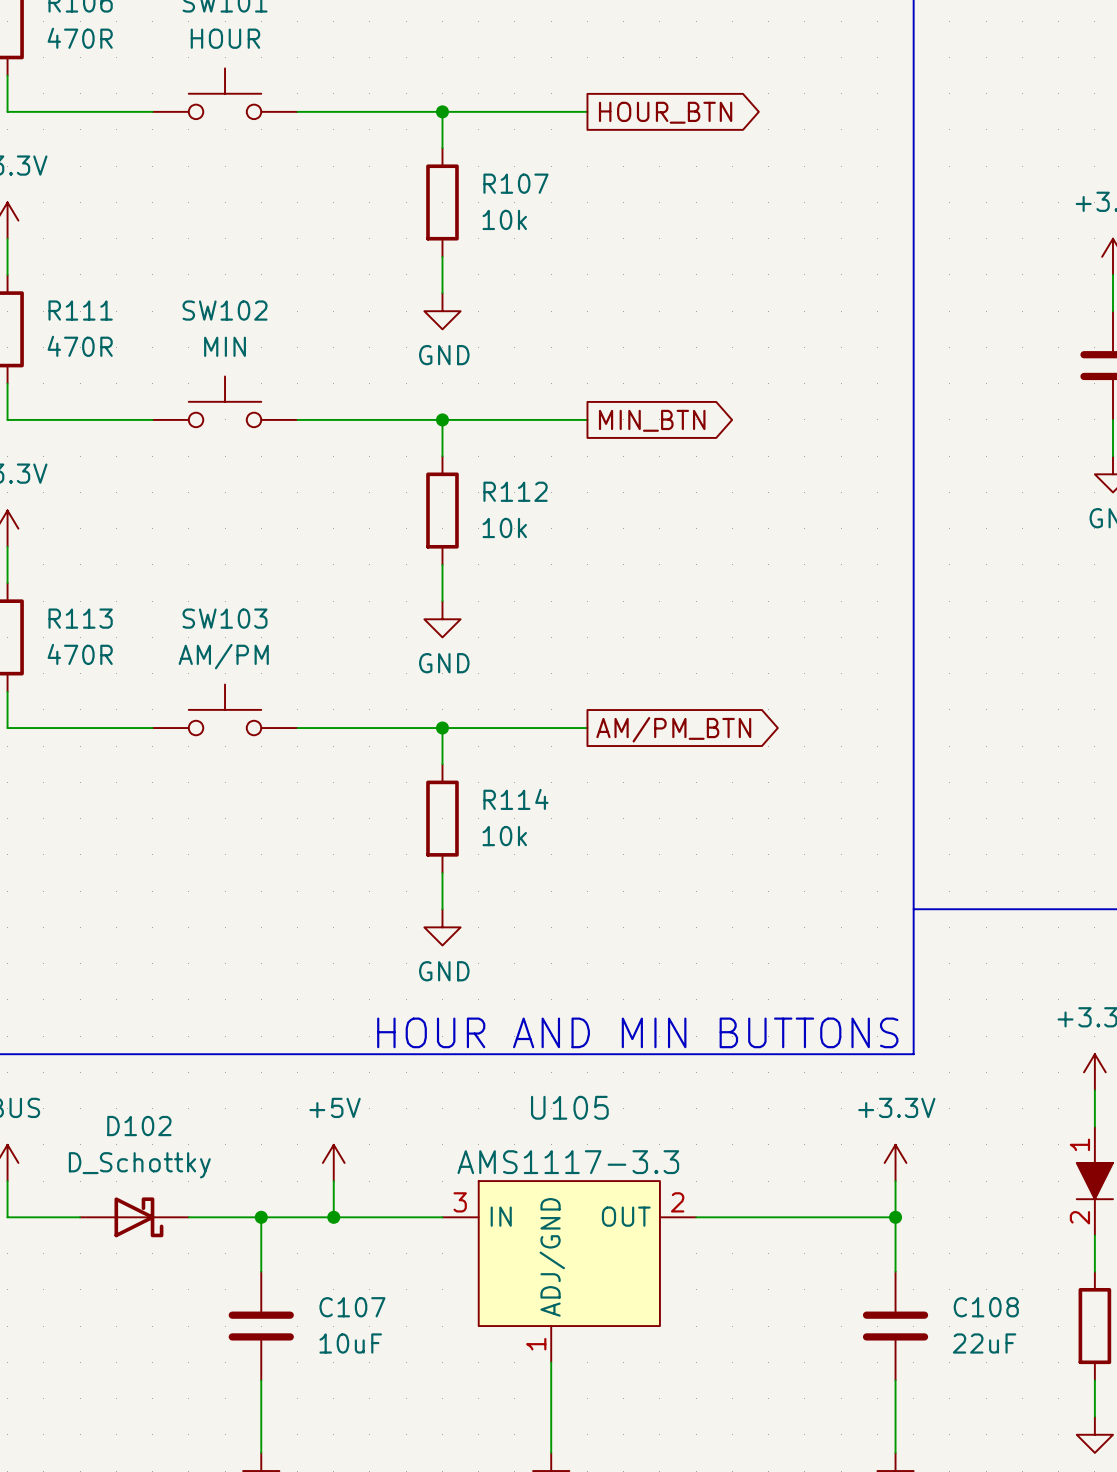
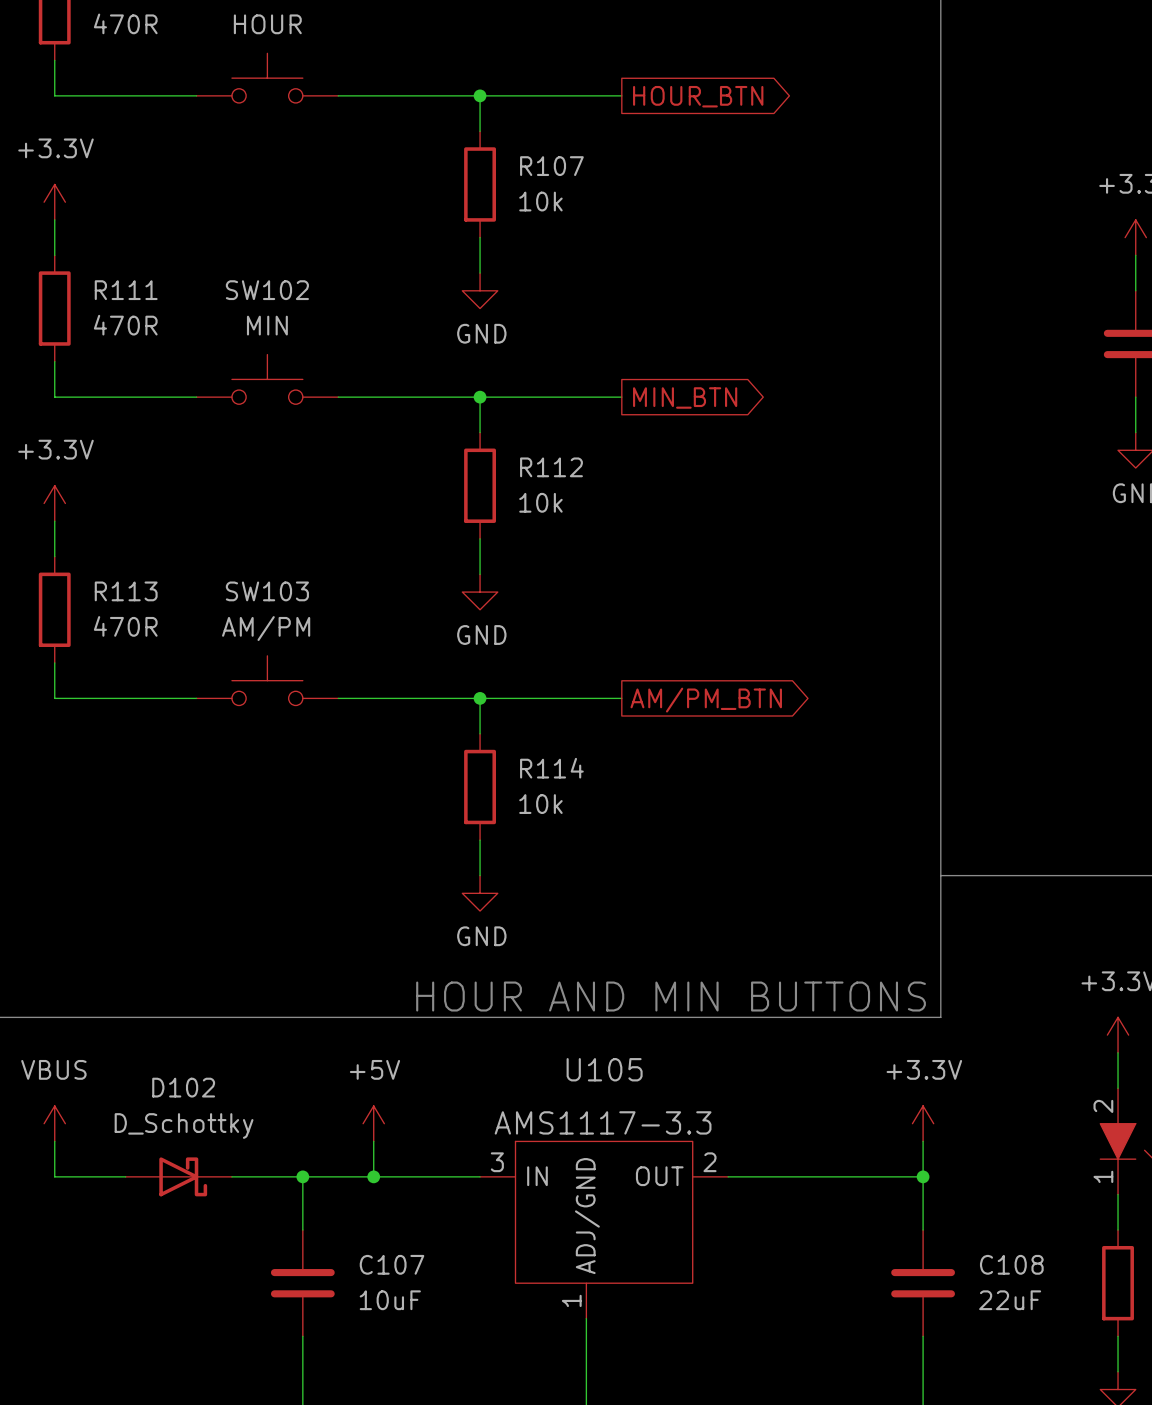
part pin number: 1 (1079, 1144) -> 2 (1103, 1106)
part pin number: 2 (1079, 1217) -> 1 (1103, 1176)

